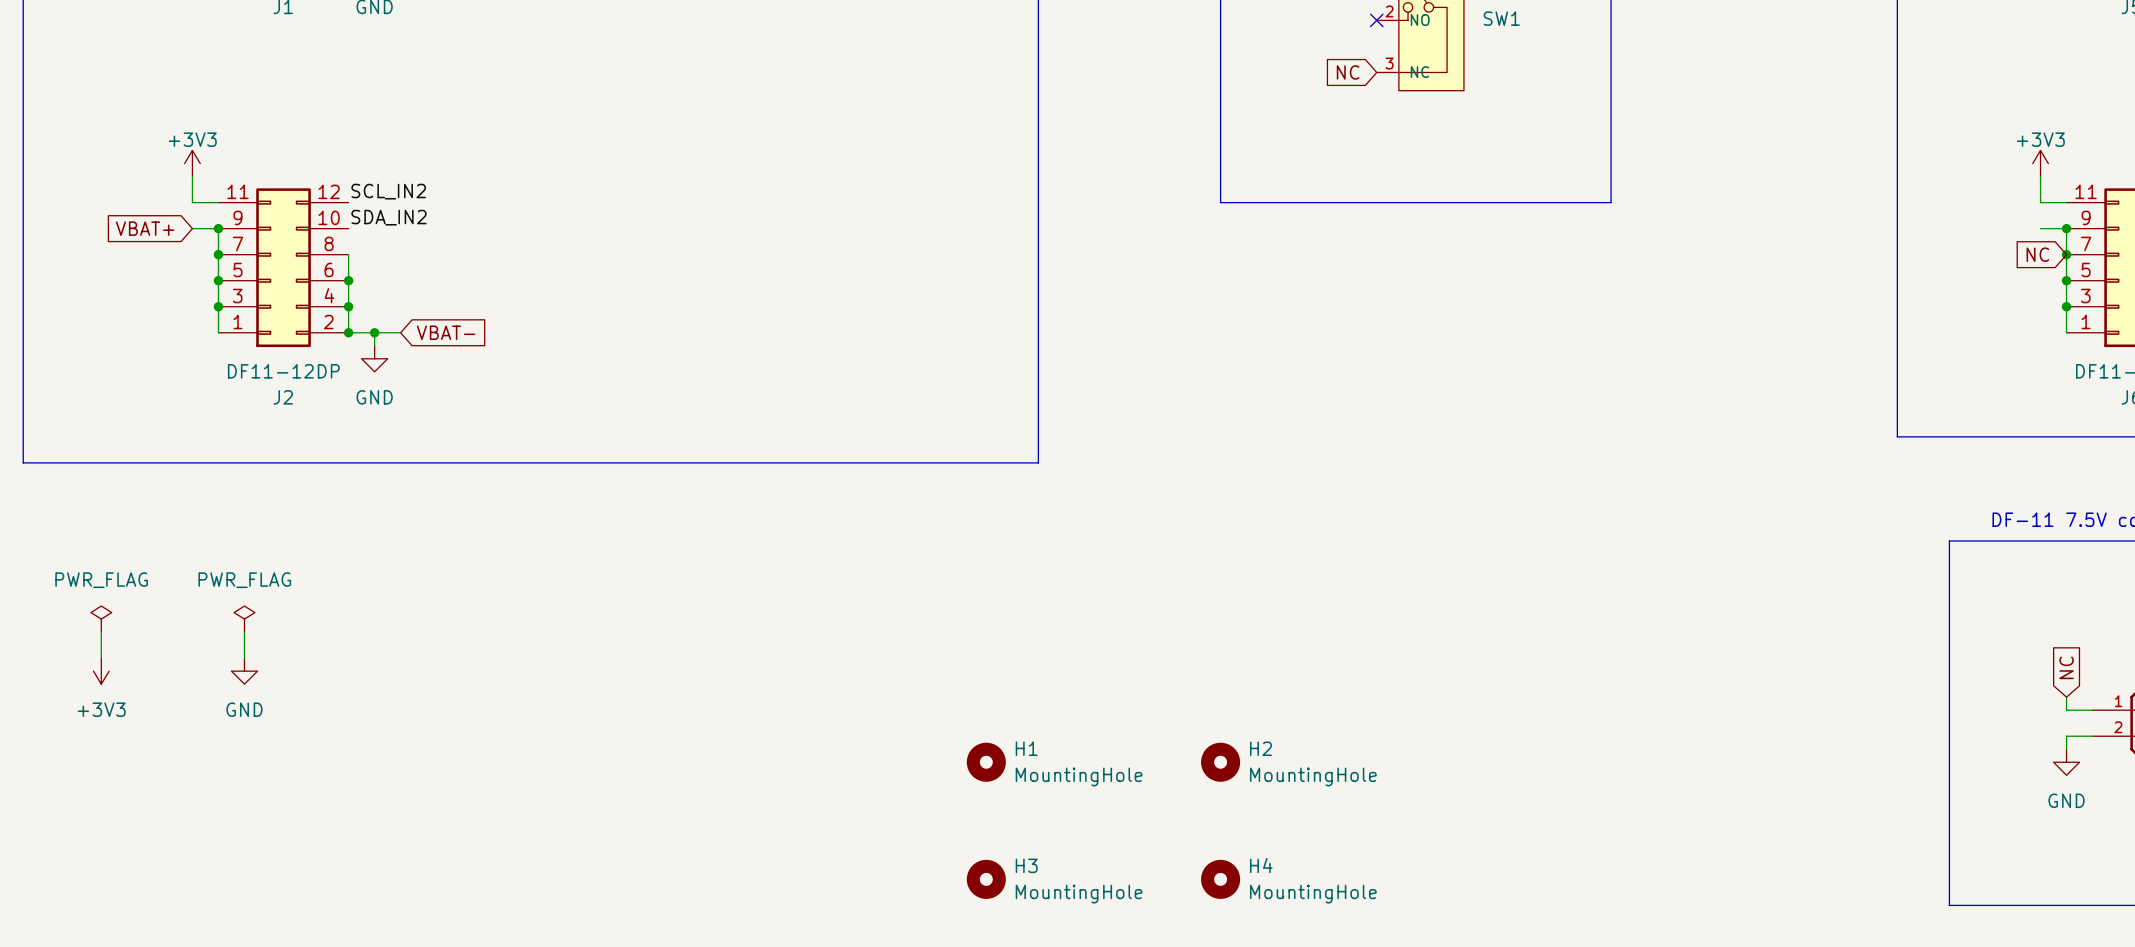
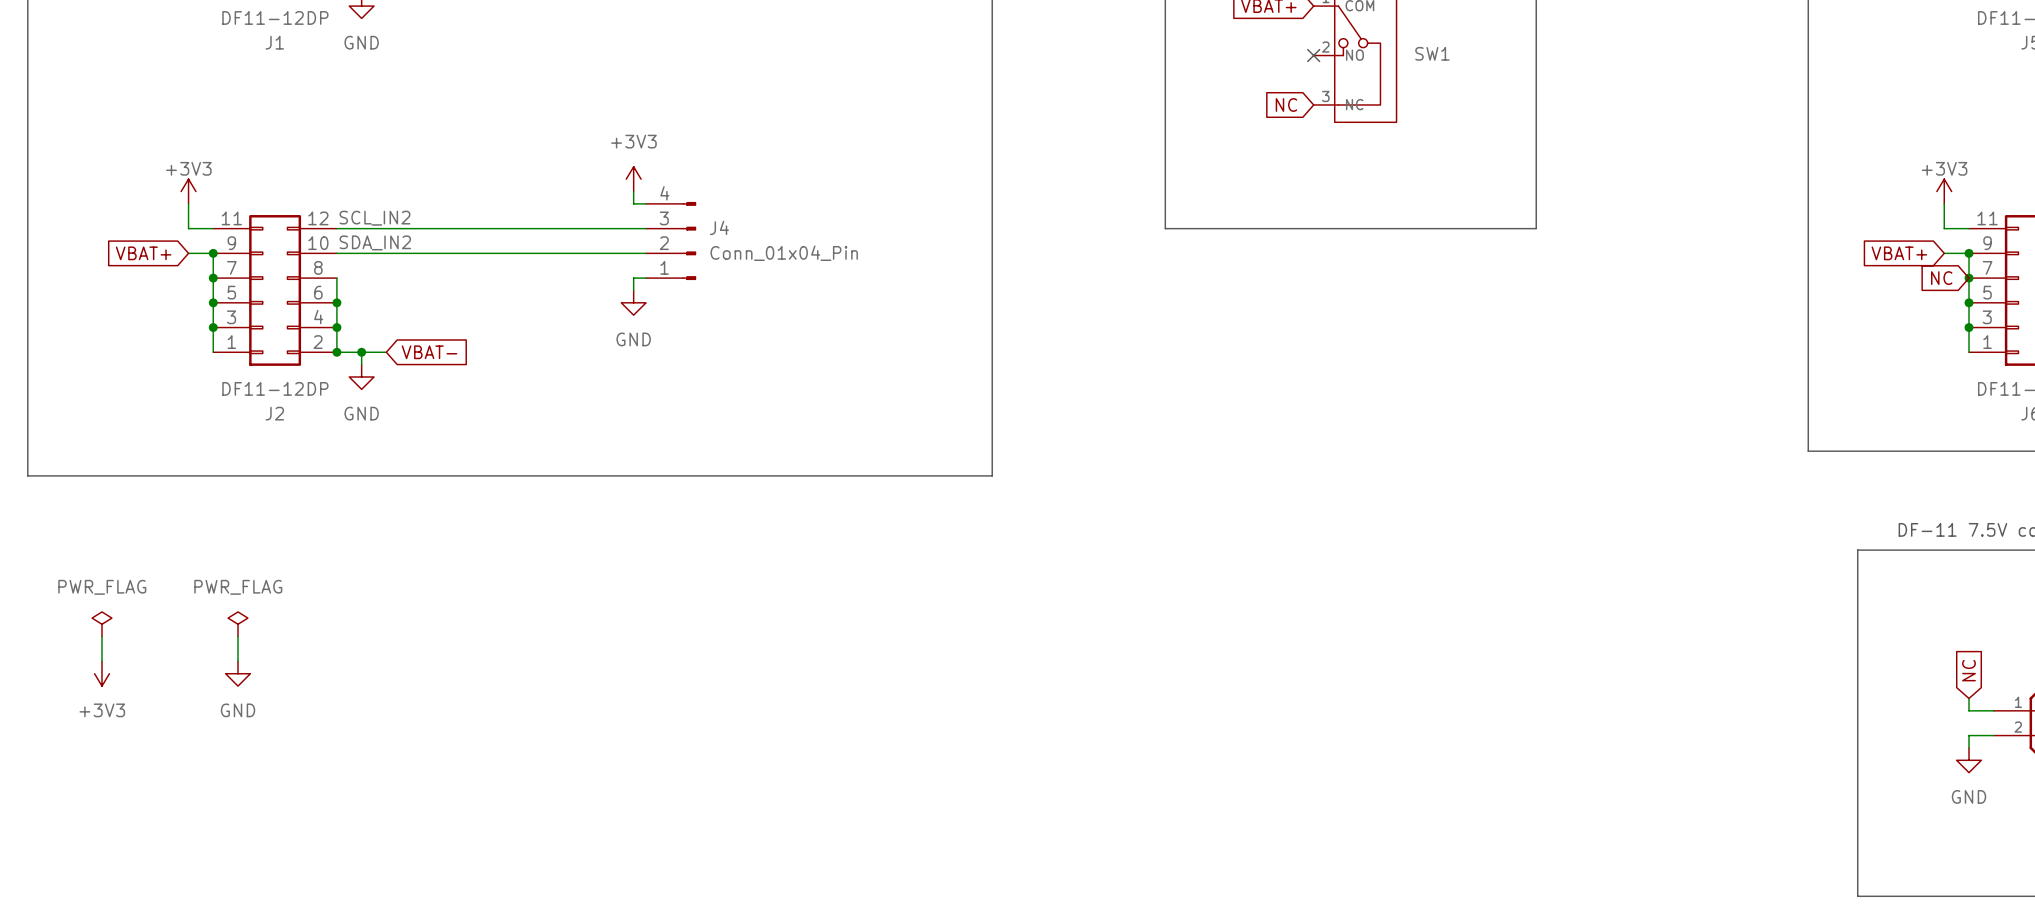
power symbol: none -> +3V3 (633, 179)
wire: none -> (633, 191) (633, 203) (646, 203)
wire: none -> (336, 228) (646, 228)
J4: none -> Conn_01x04_Pin (671, 240)
wire: none -> (336, 253) (646, 253)
global label: none -> VBAT+ (1899, 253)
wire: none -> (646, 278) (633, 278) (633, 290)
power symbol: none -> GND (633, 302)
H1: MountingHole (986, 762) -> none
H2: MountingHole (1220, 762) -> none
H3: MountingHole (986, 879) -> none
H4: MountingHole (1220, 879) -> none

